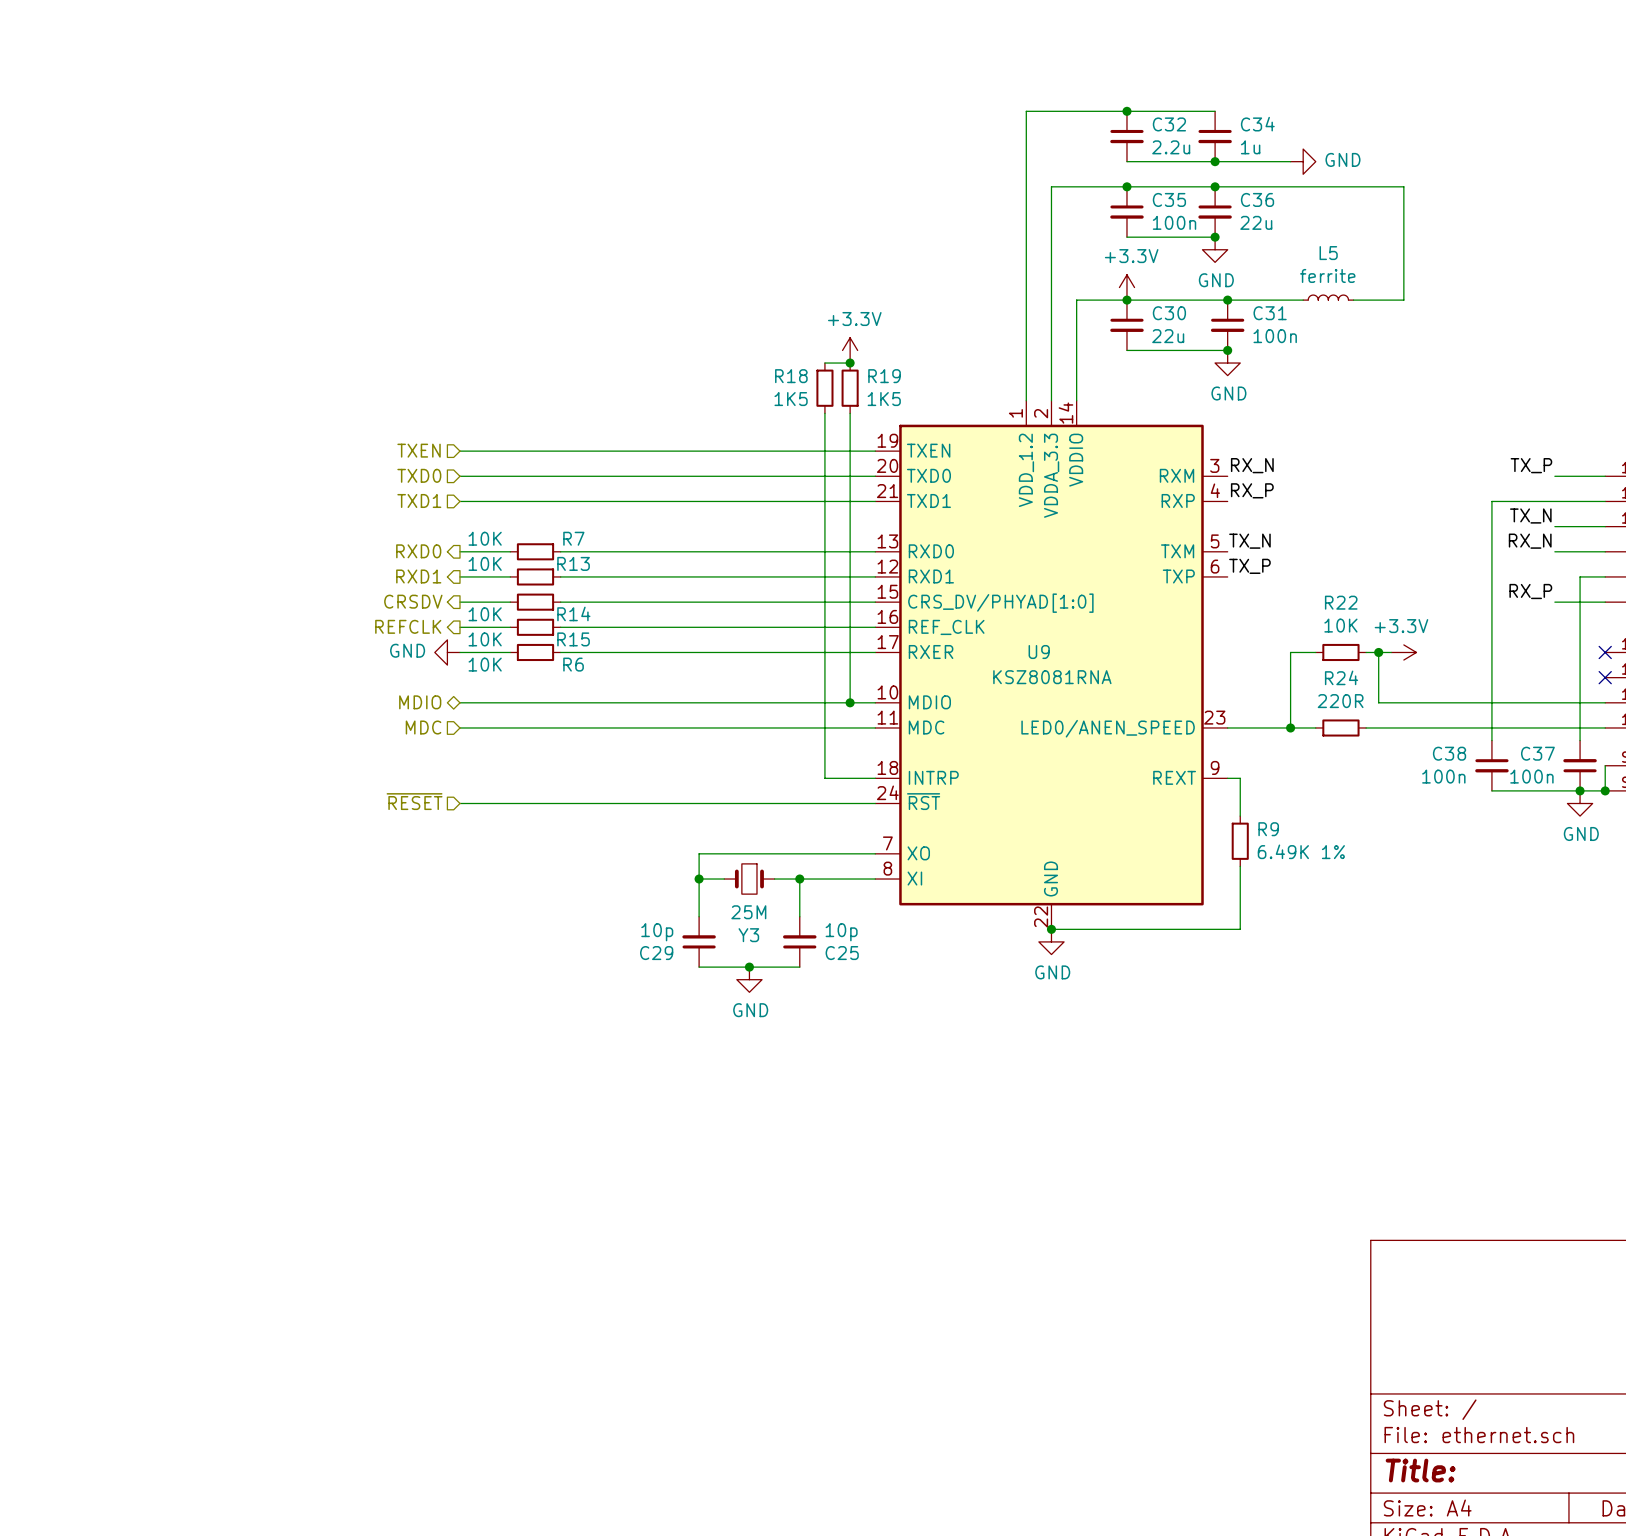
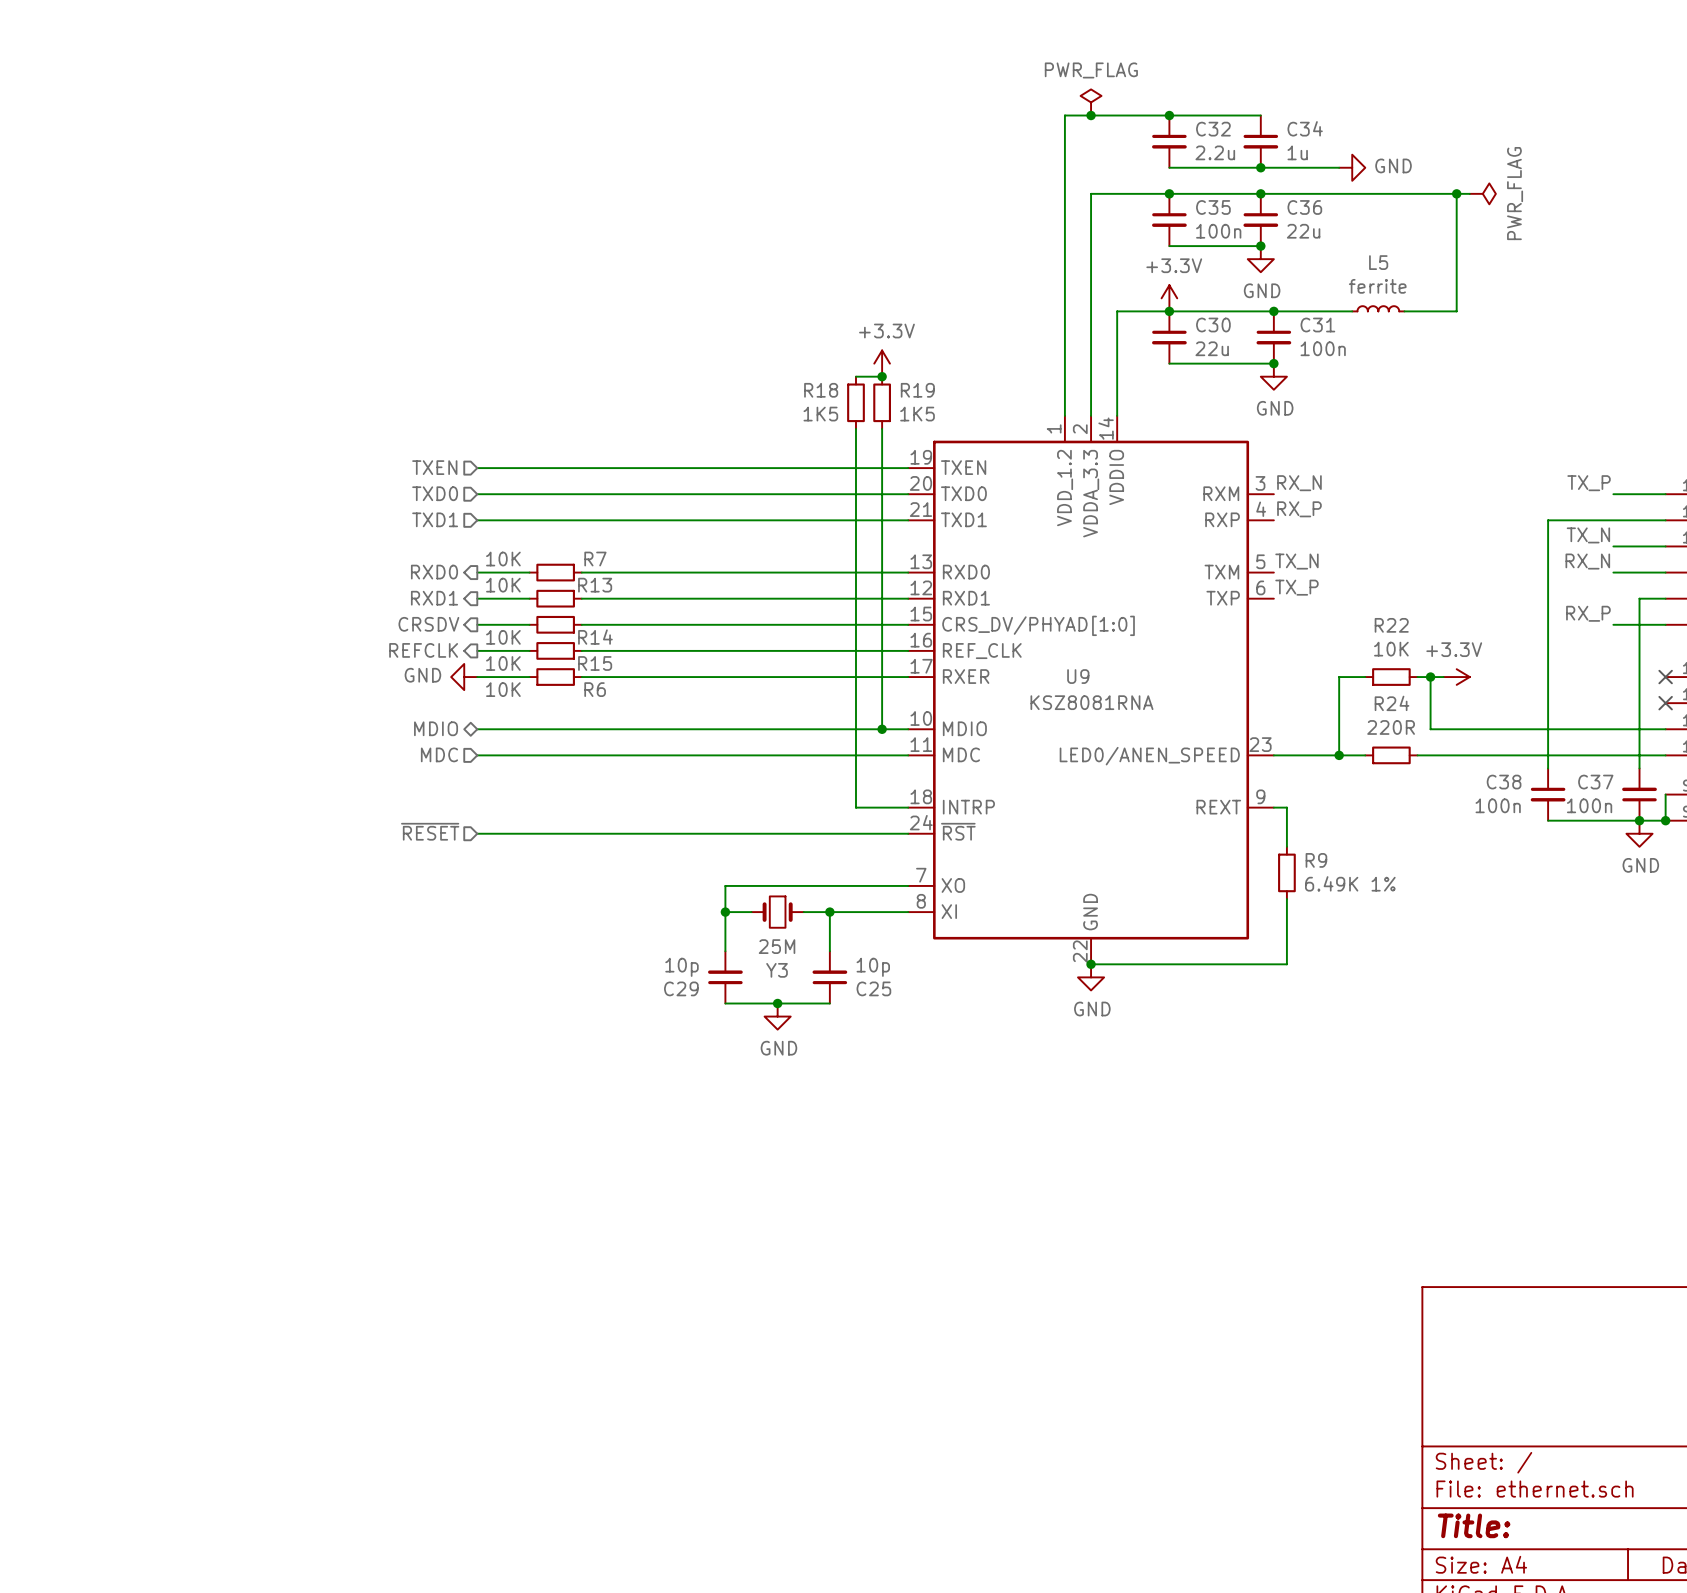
power symbol: none -> PWR_FLAG (1091, 102)
junction: none -> (1091, 115)
wire: none -> (1456, 193) (1469, 193)
junction: none -> (1456, 193)
power symbol: none -> PWR_FLAG (1482, 193)

